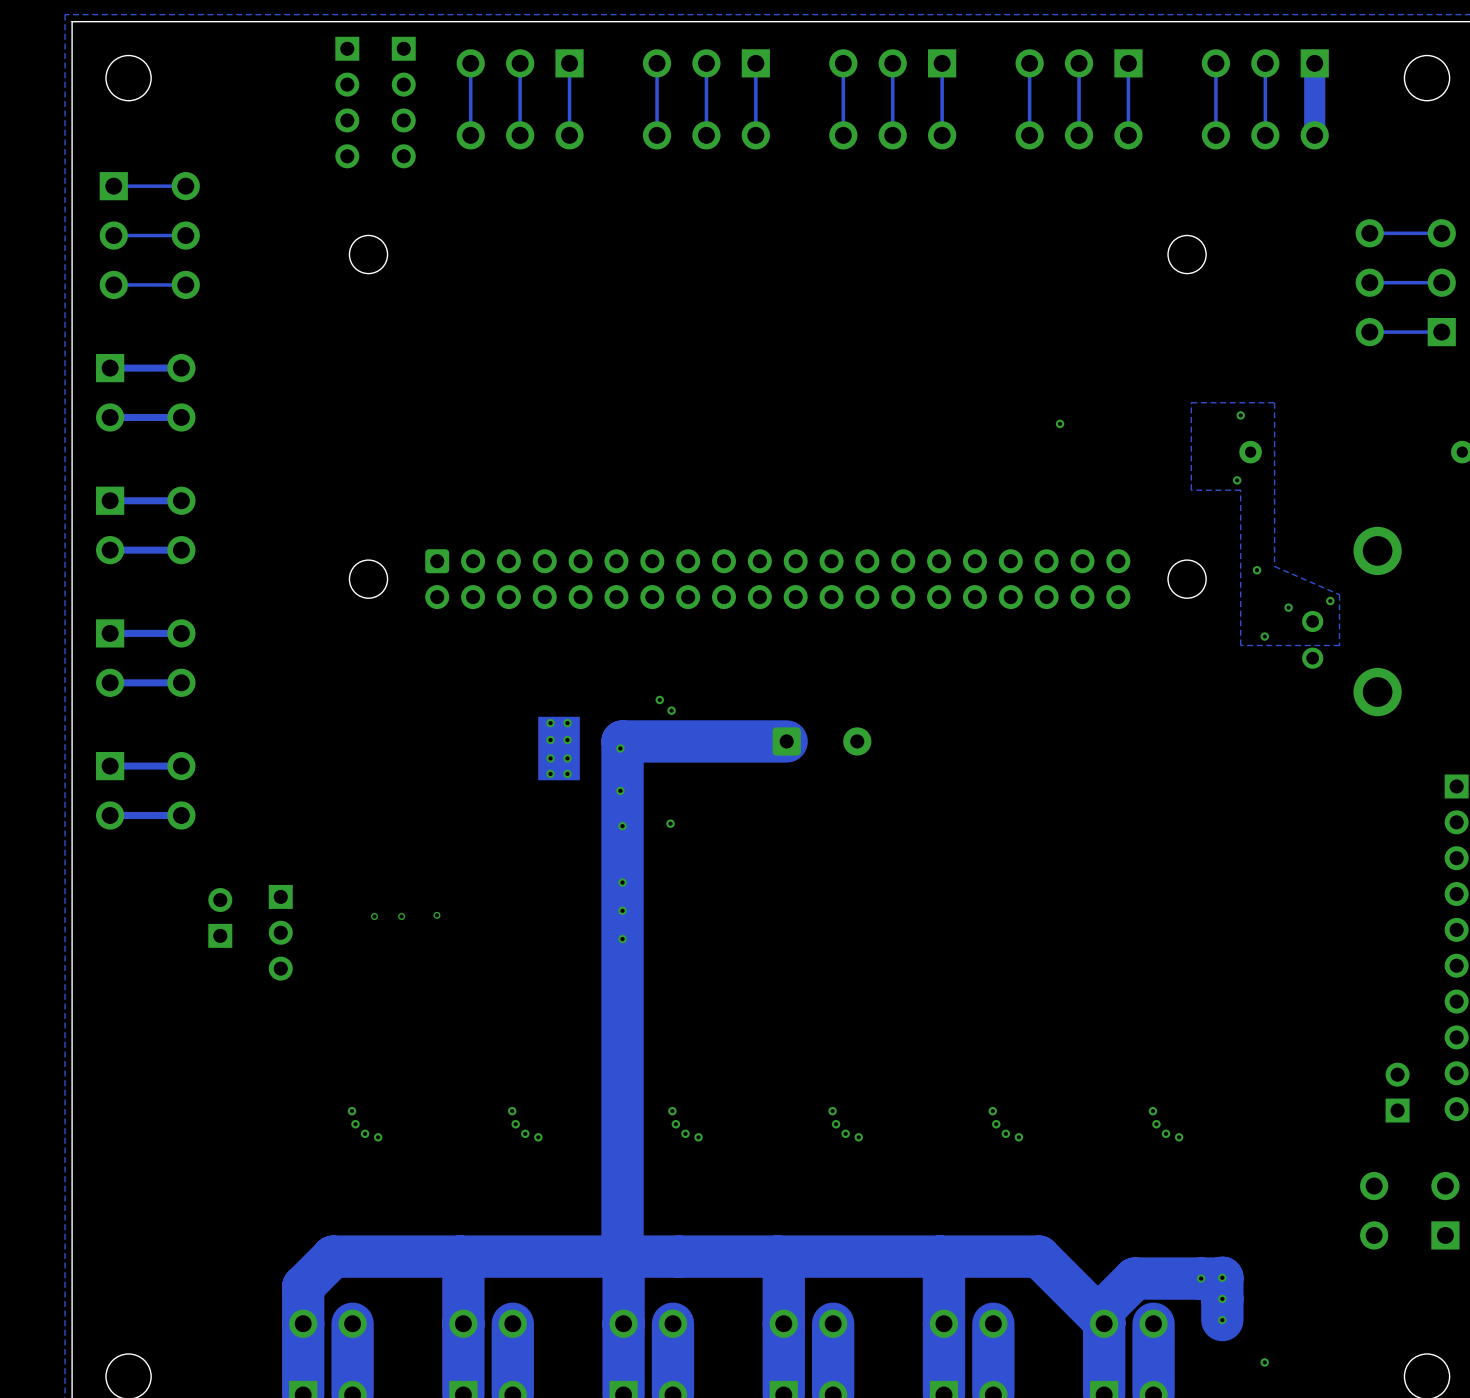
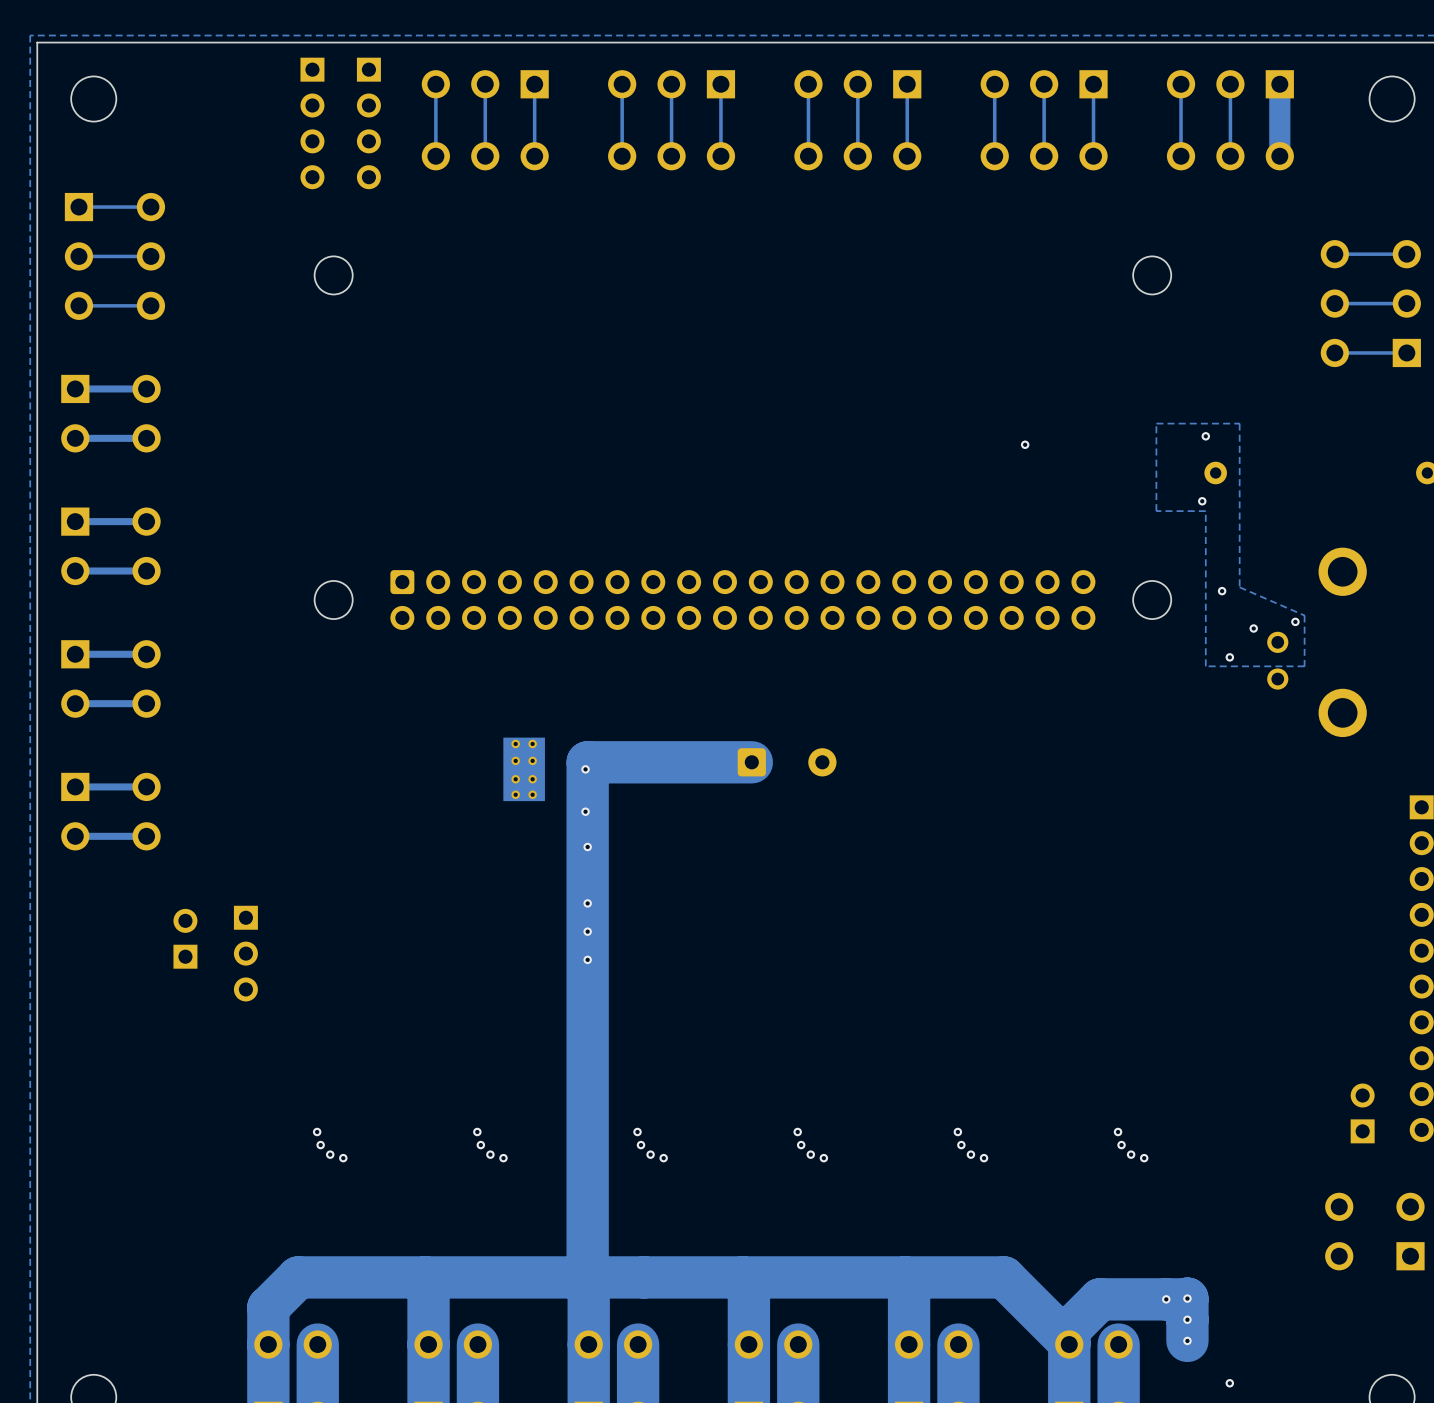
via: (659, 699) -> none
via: (671, 710) -> none
via: (670, 823) -> none
via: (436, 915) -> none
via: (374, 916) -> none
via: (401, 916) -> none

